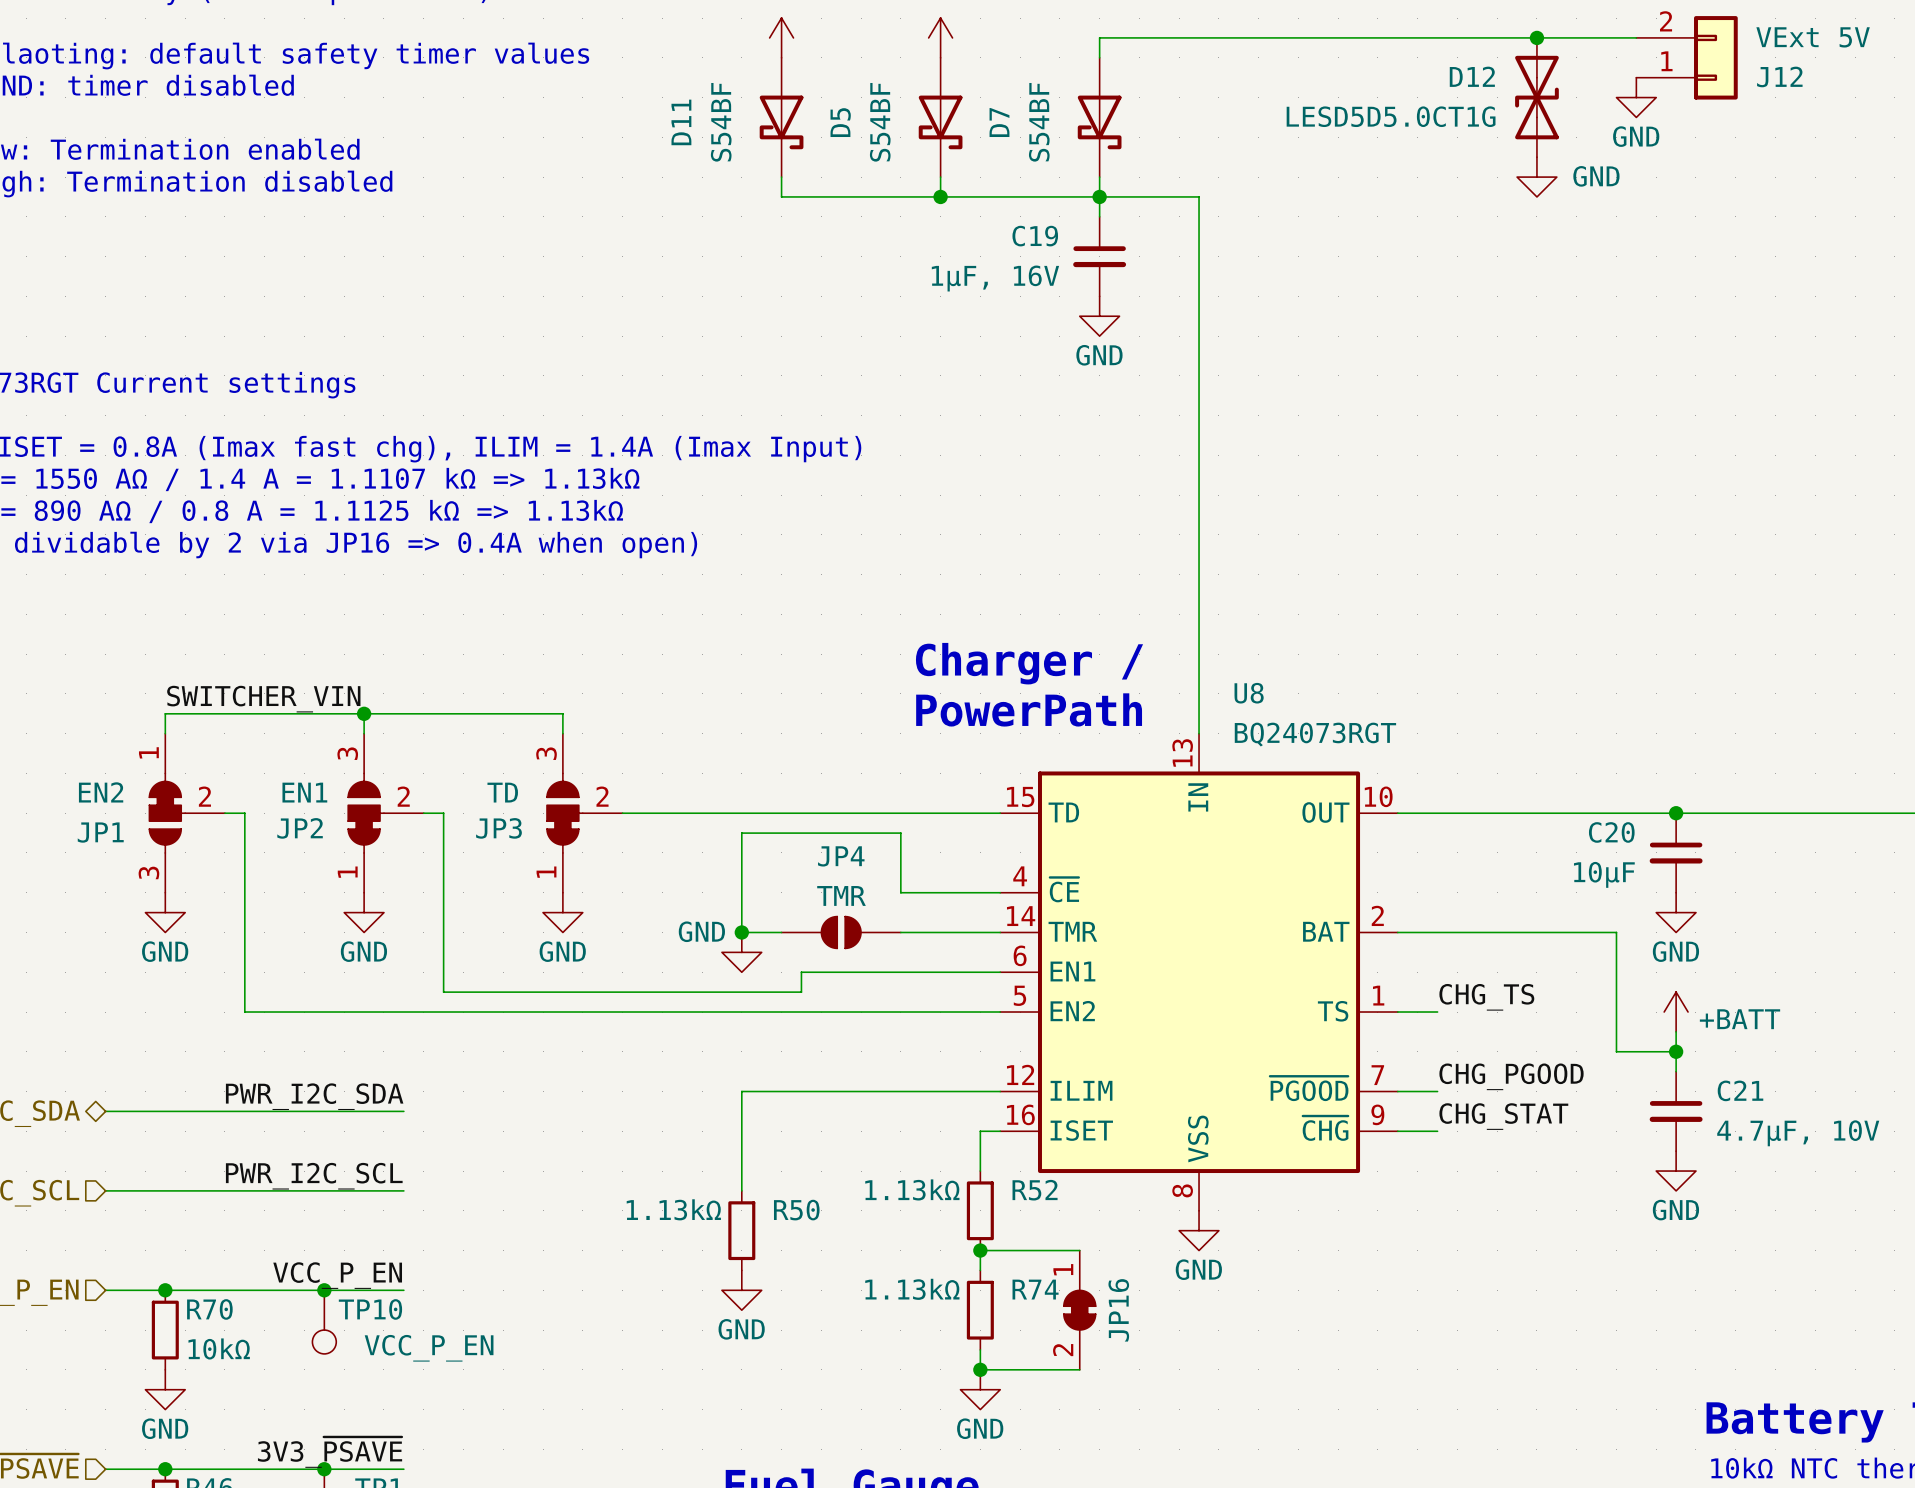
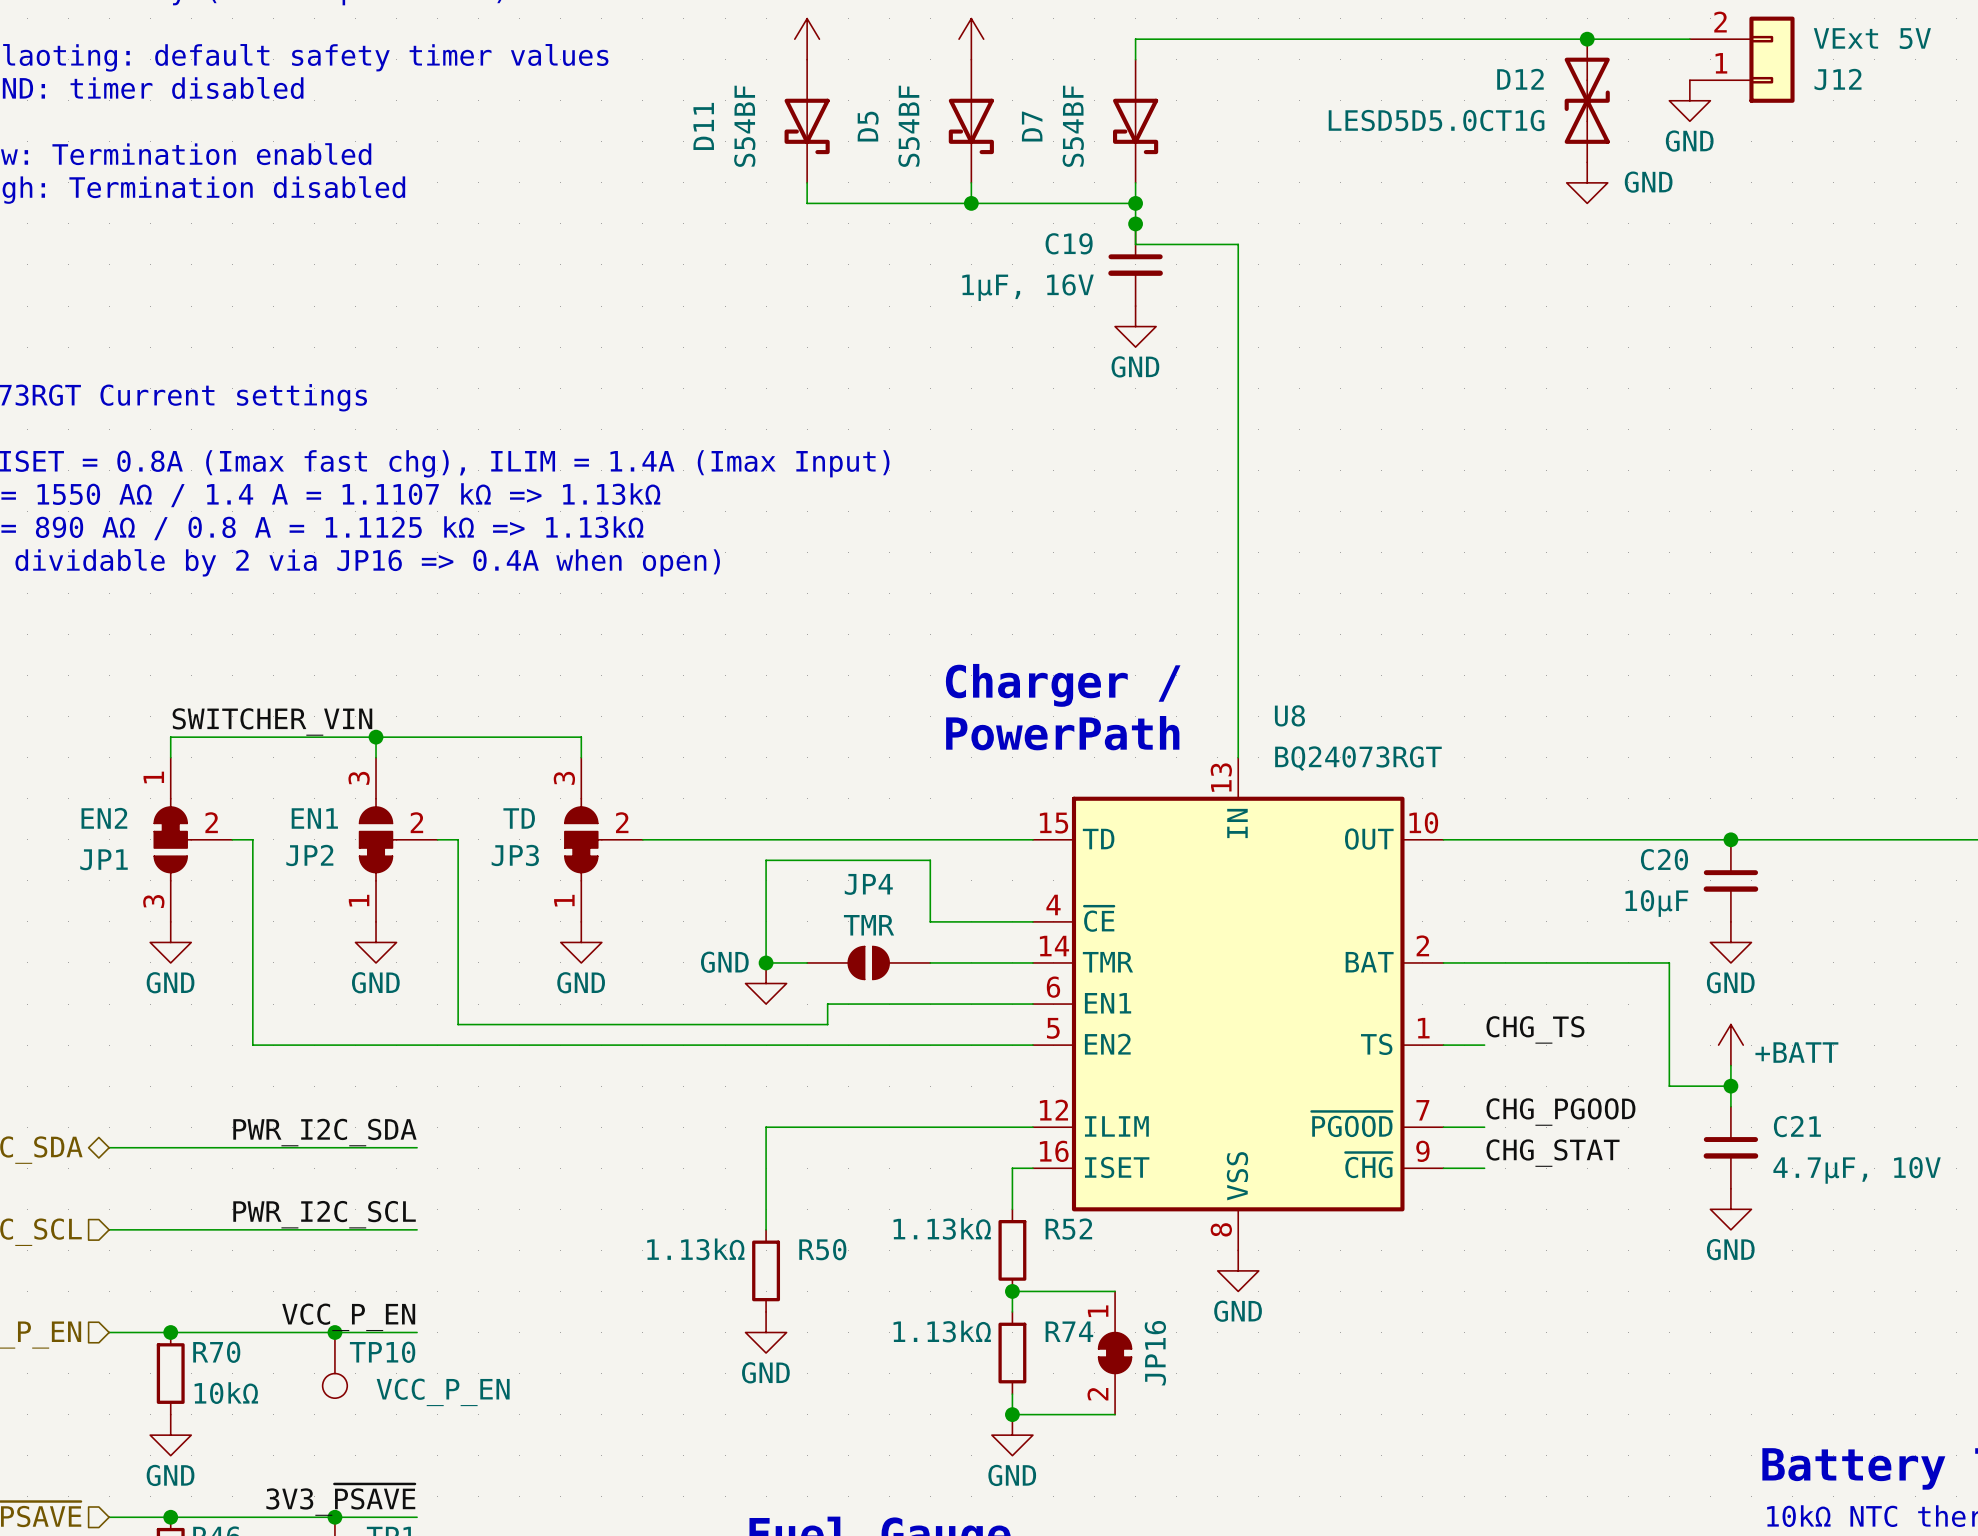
wire: (1099, 196) (1199, 196) (1199, 236) -> (1135, 223) (1135, 244) (1238, 244)
junction: none -> (1135, 223)

